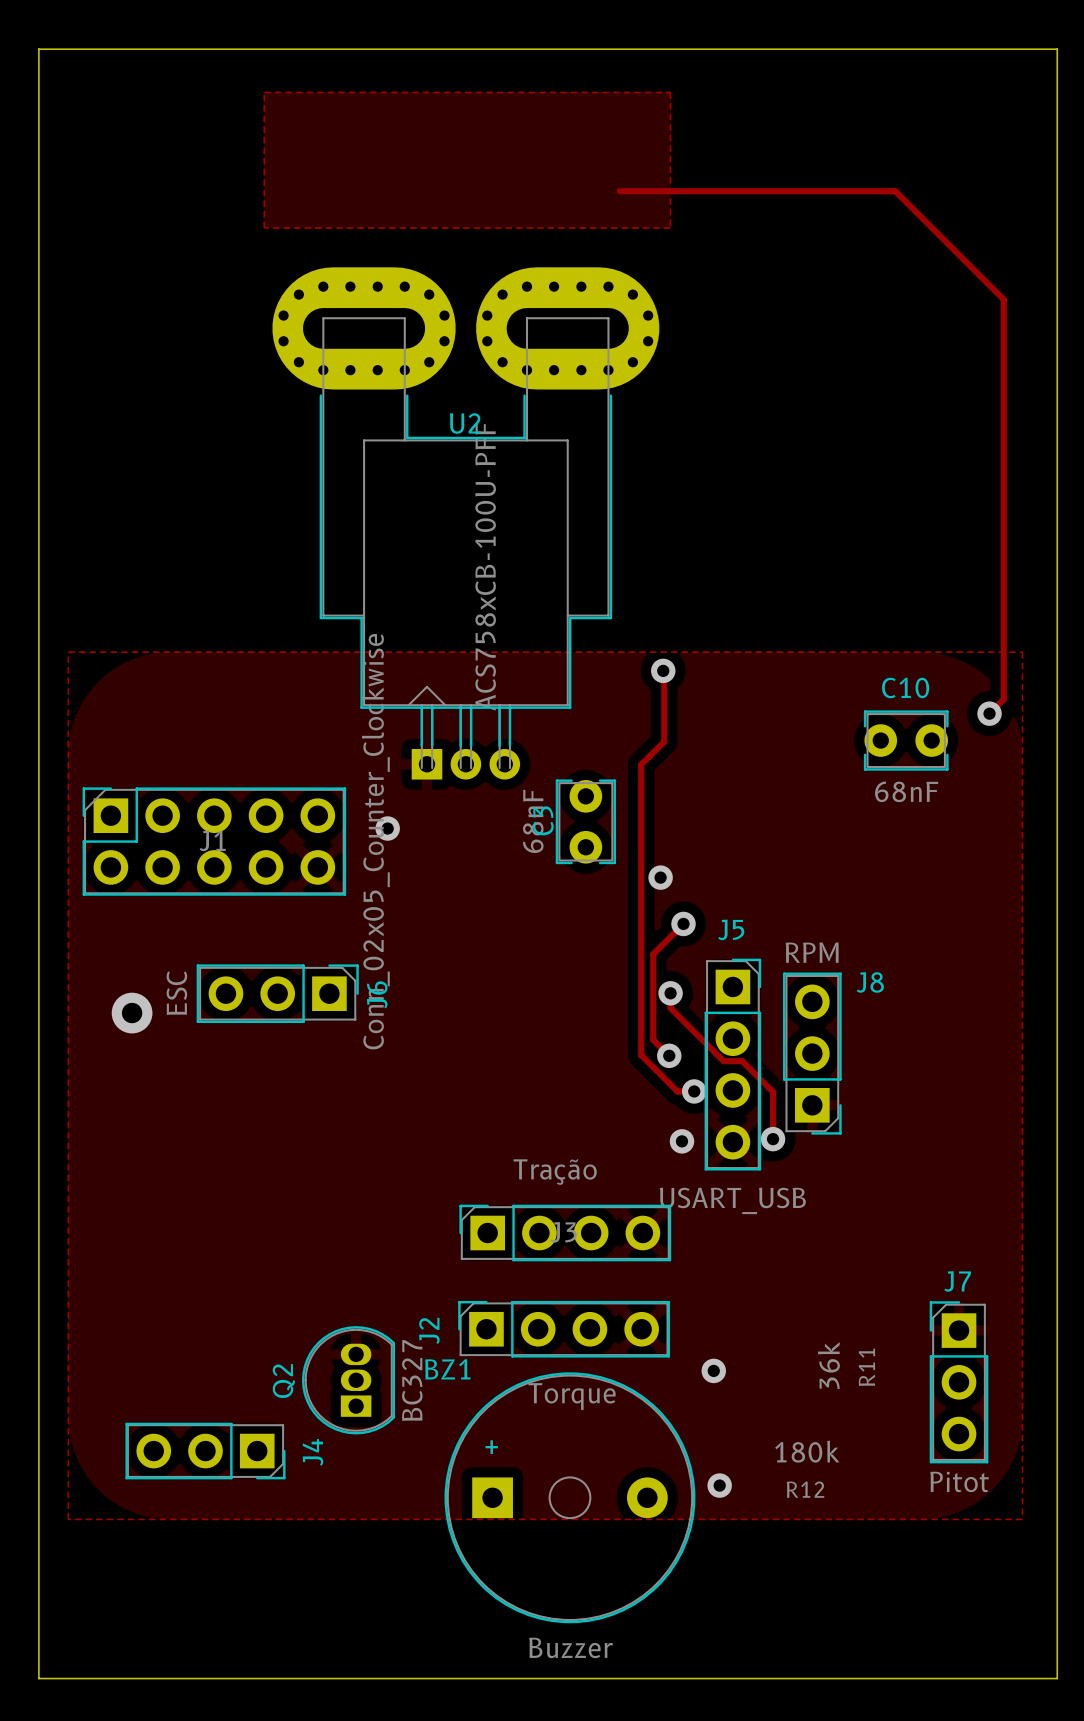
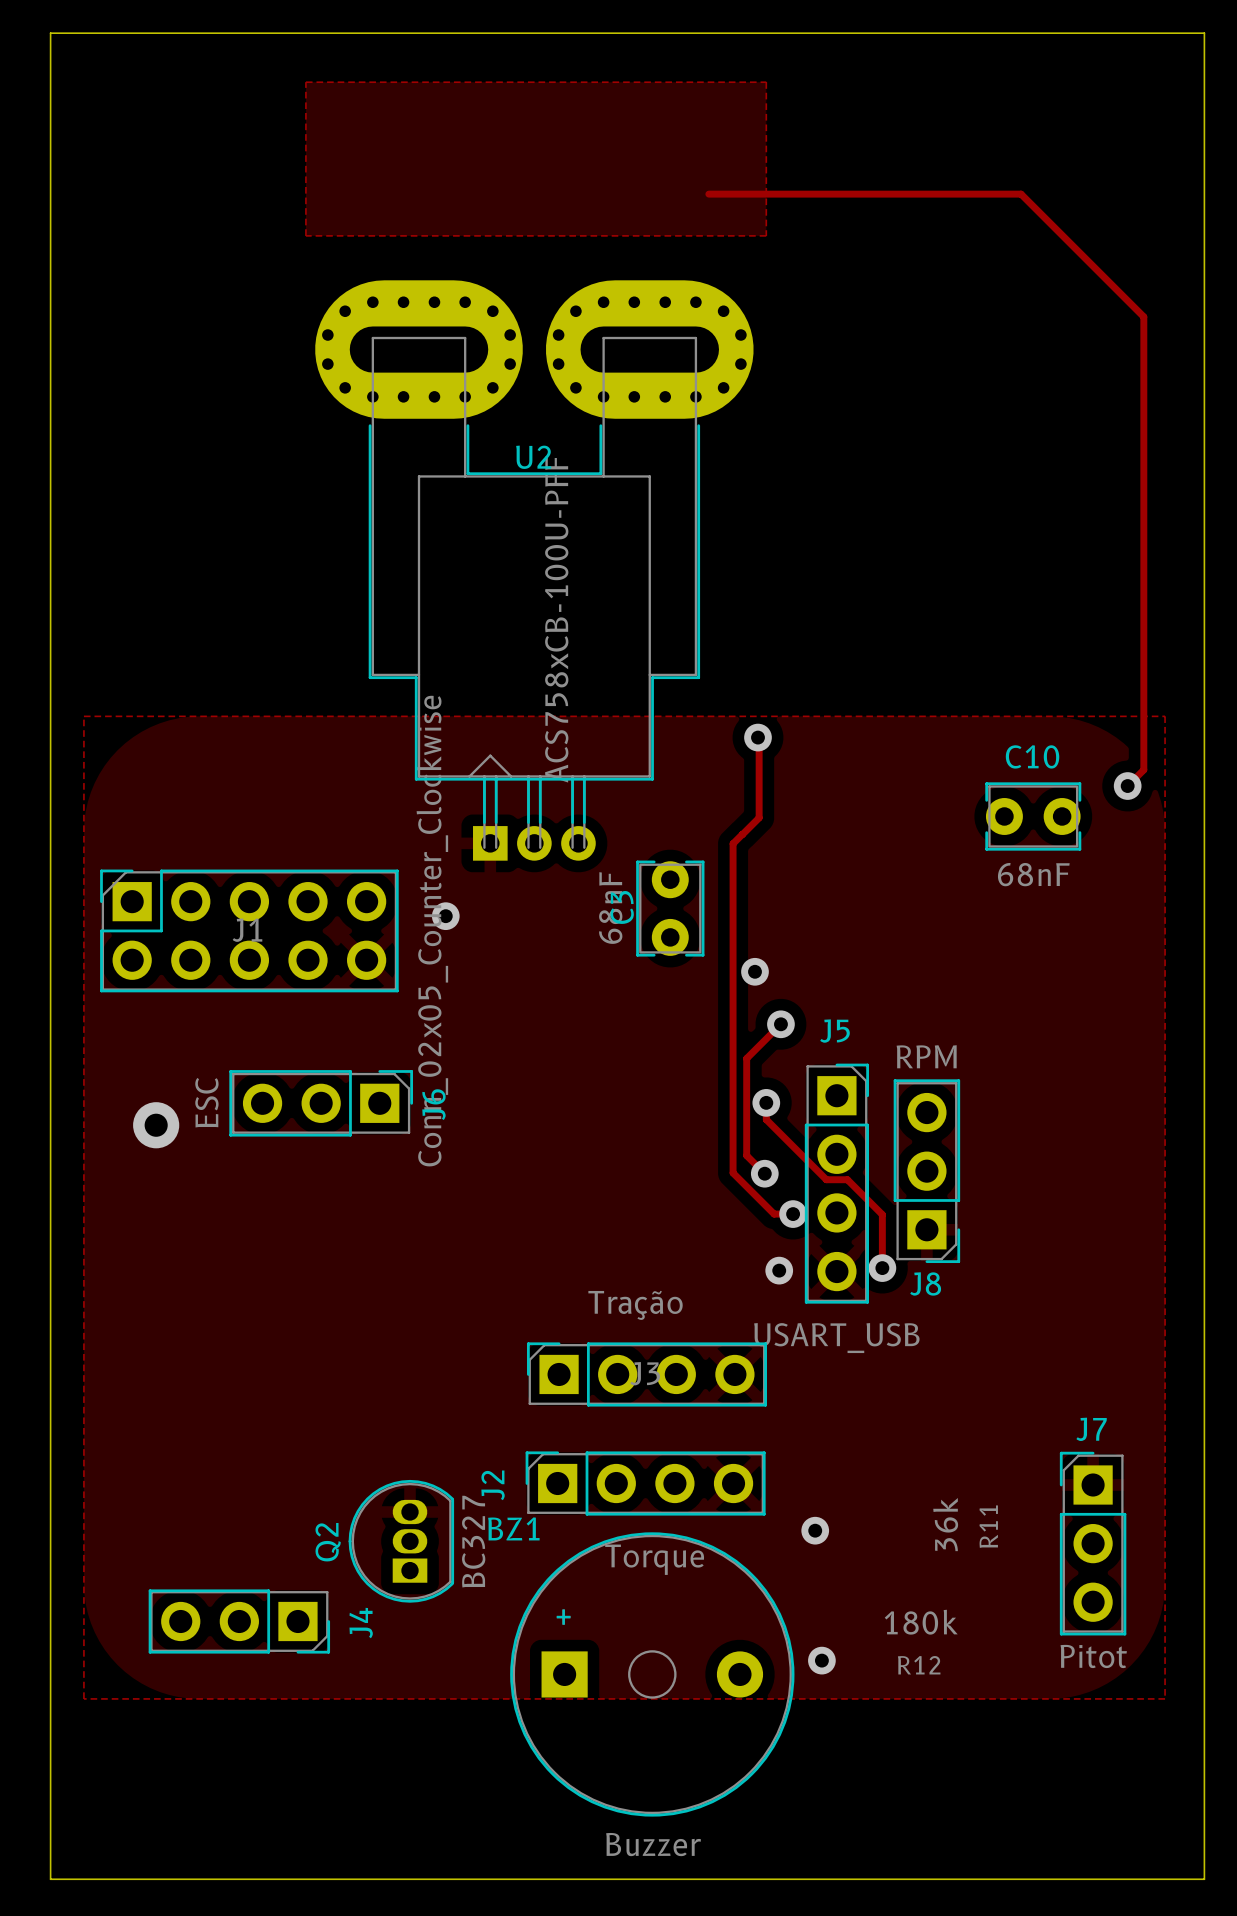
J8 name position: J8 (870, 982) -> J8 (925, 1283)

